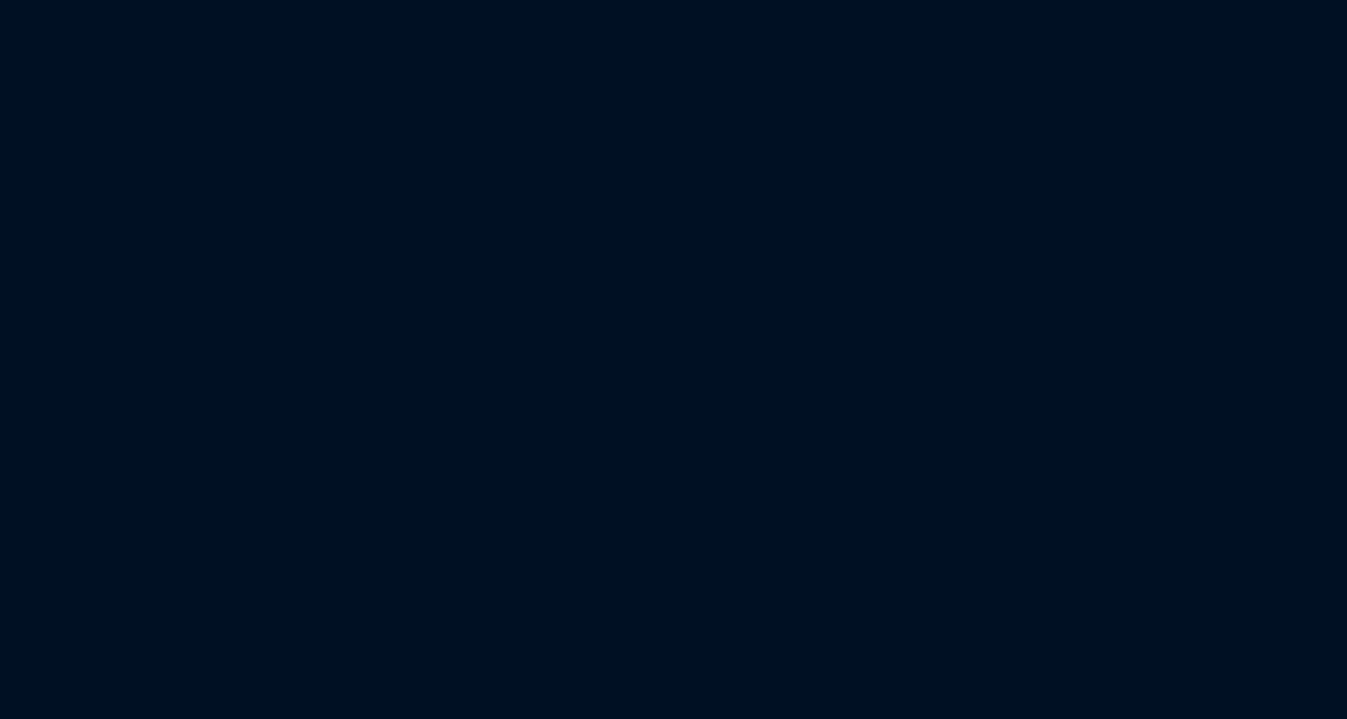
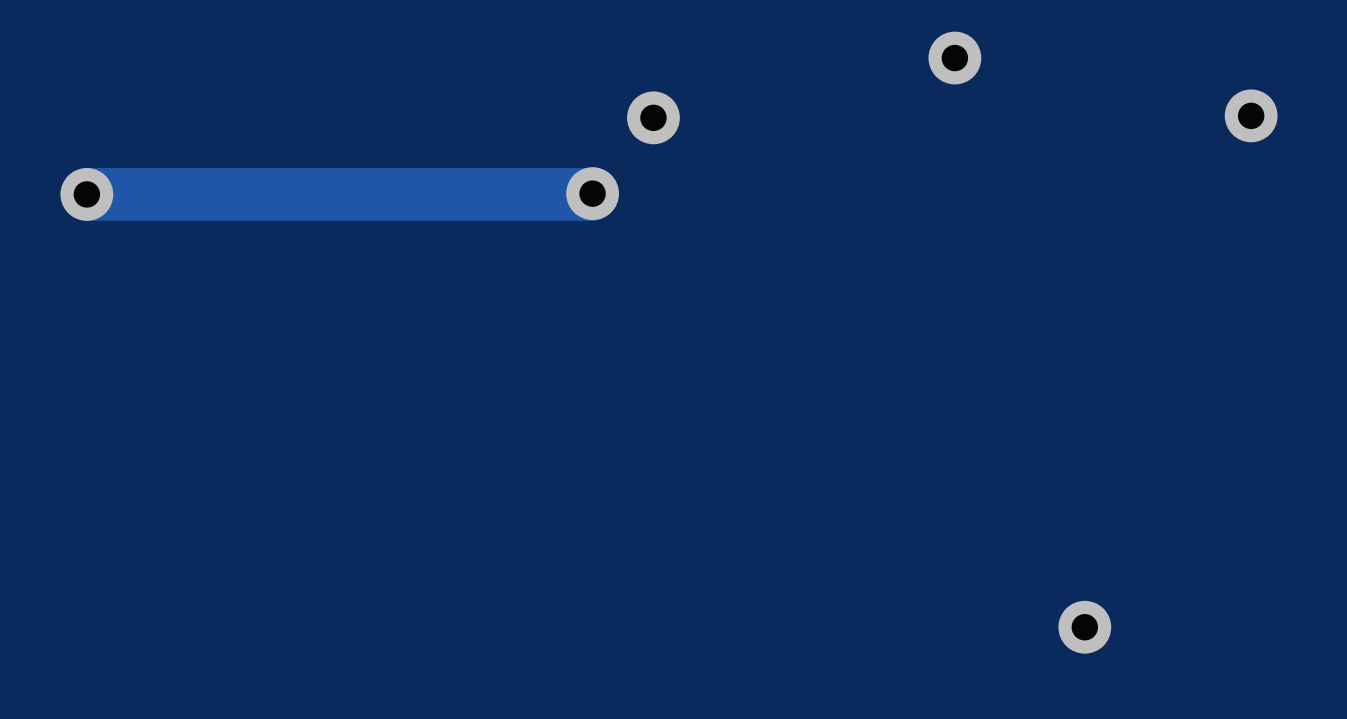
via: none -> (954, 58)
via: none -> (1251, 115)
via: none -> (653, 117)
track: none -> (592, 193) (86, 194)
via: none -> (592, 193)
via: none -> (86, 194)
via: none -> (1084, 627)

